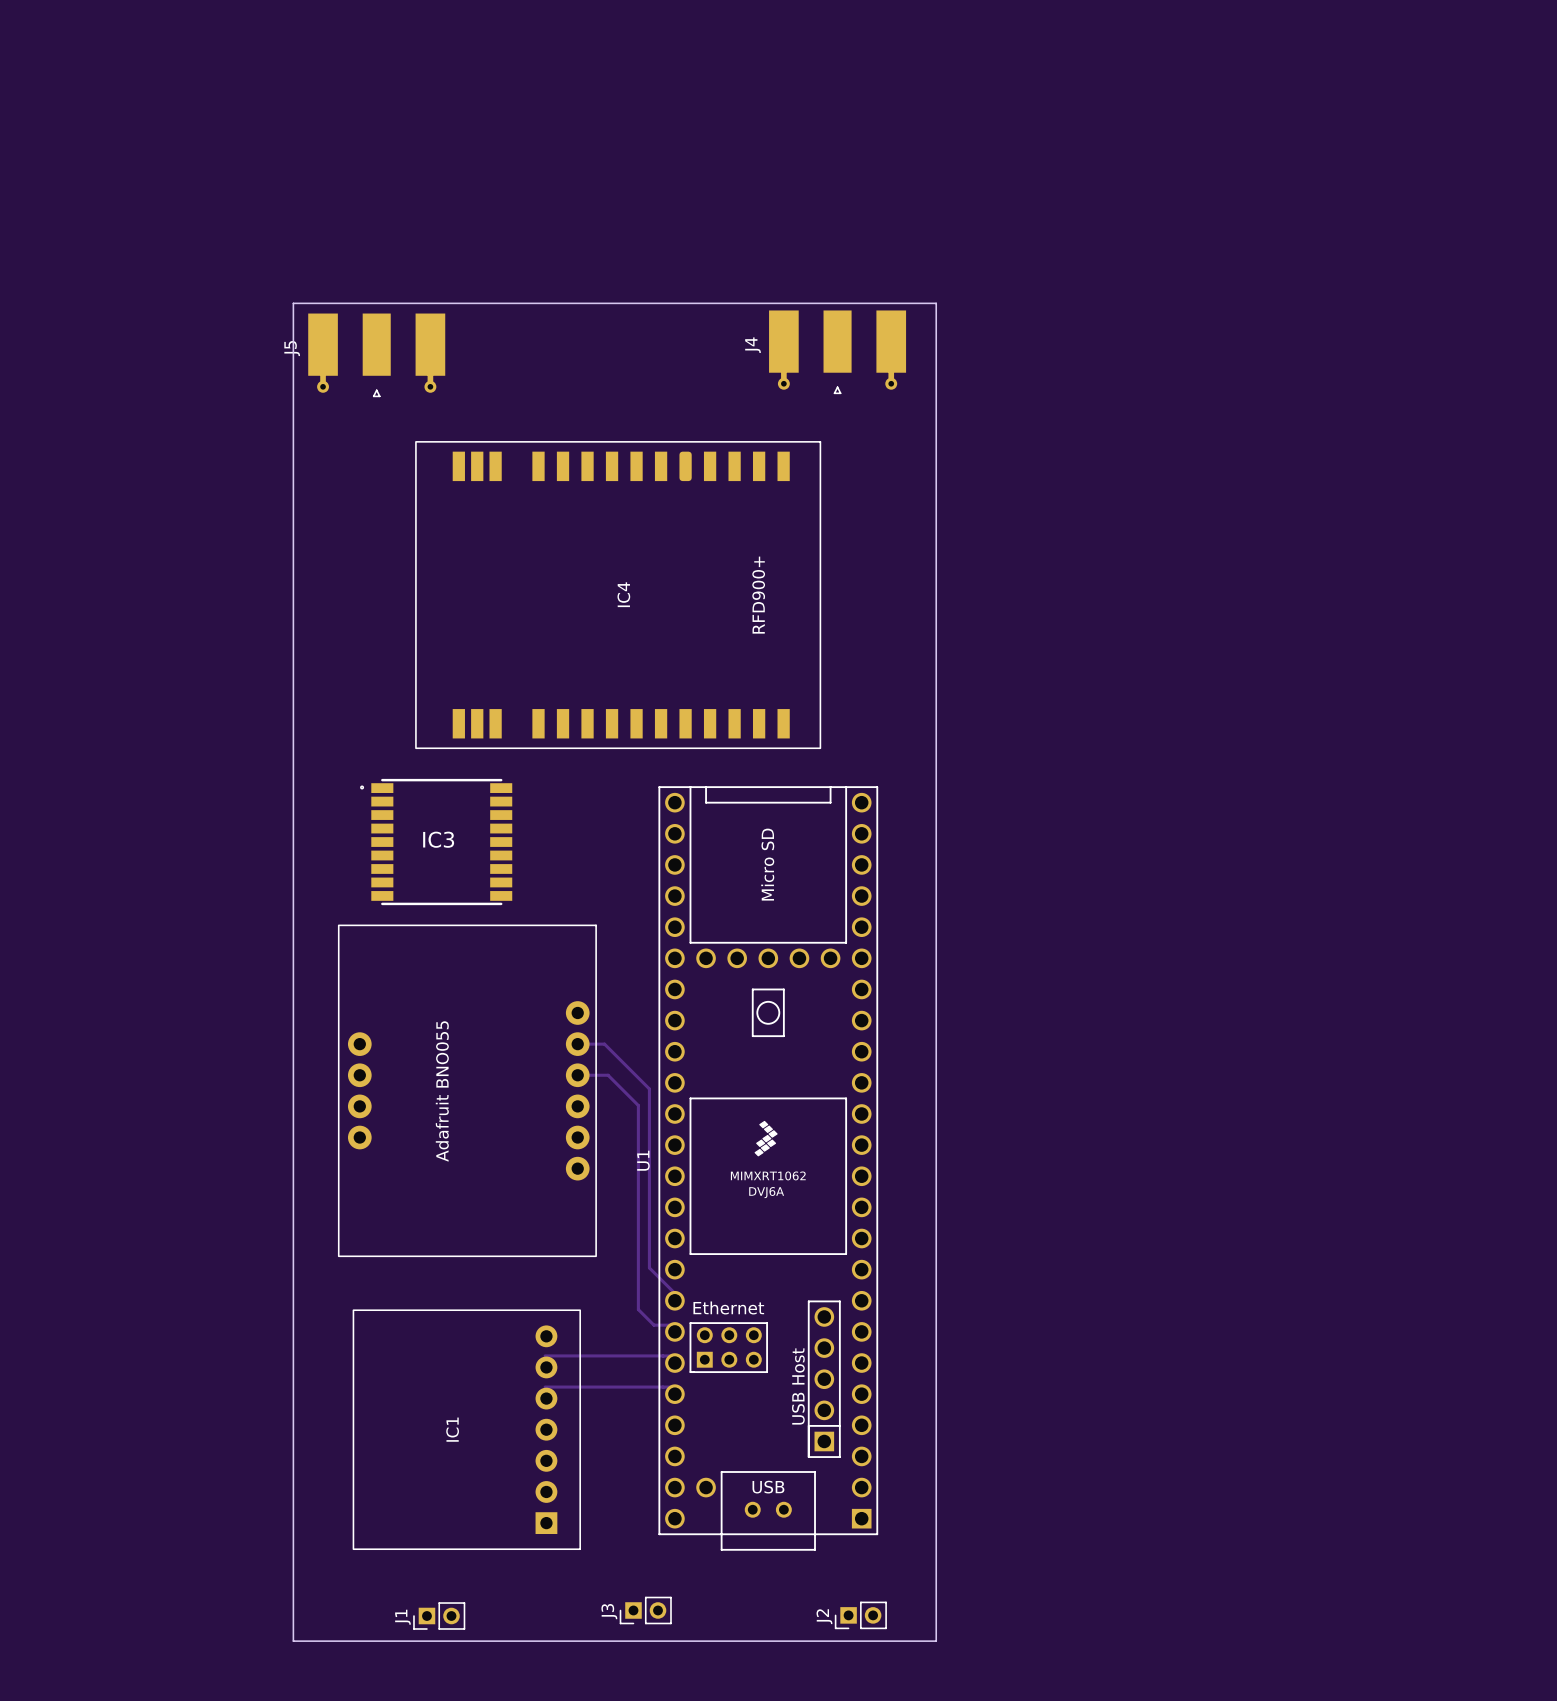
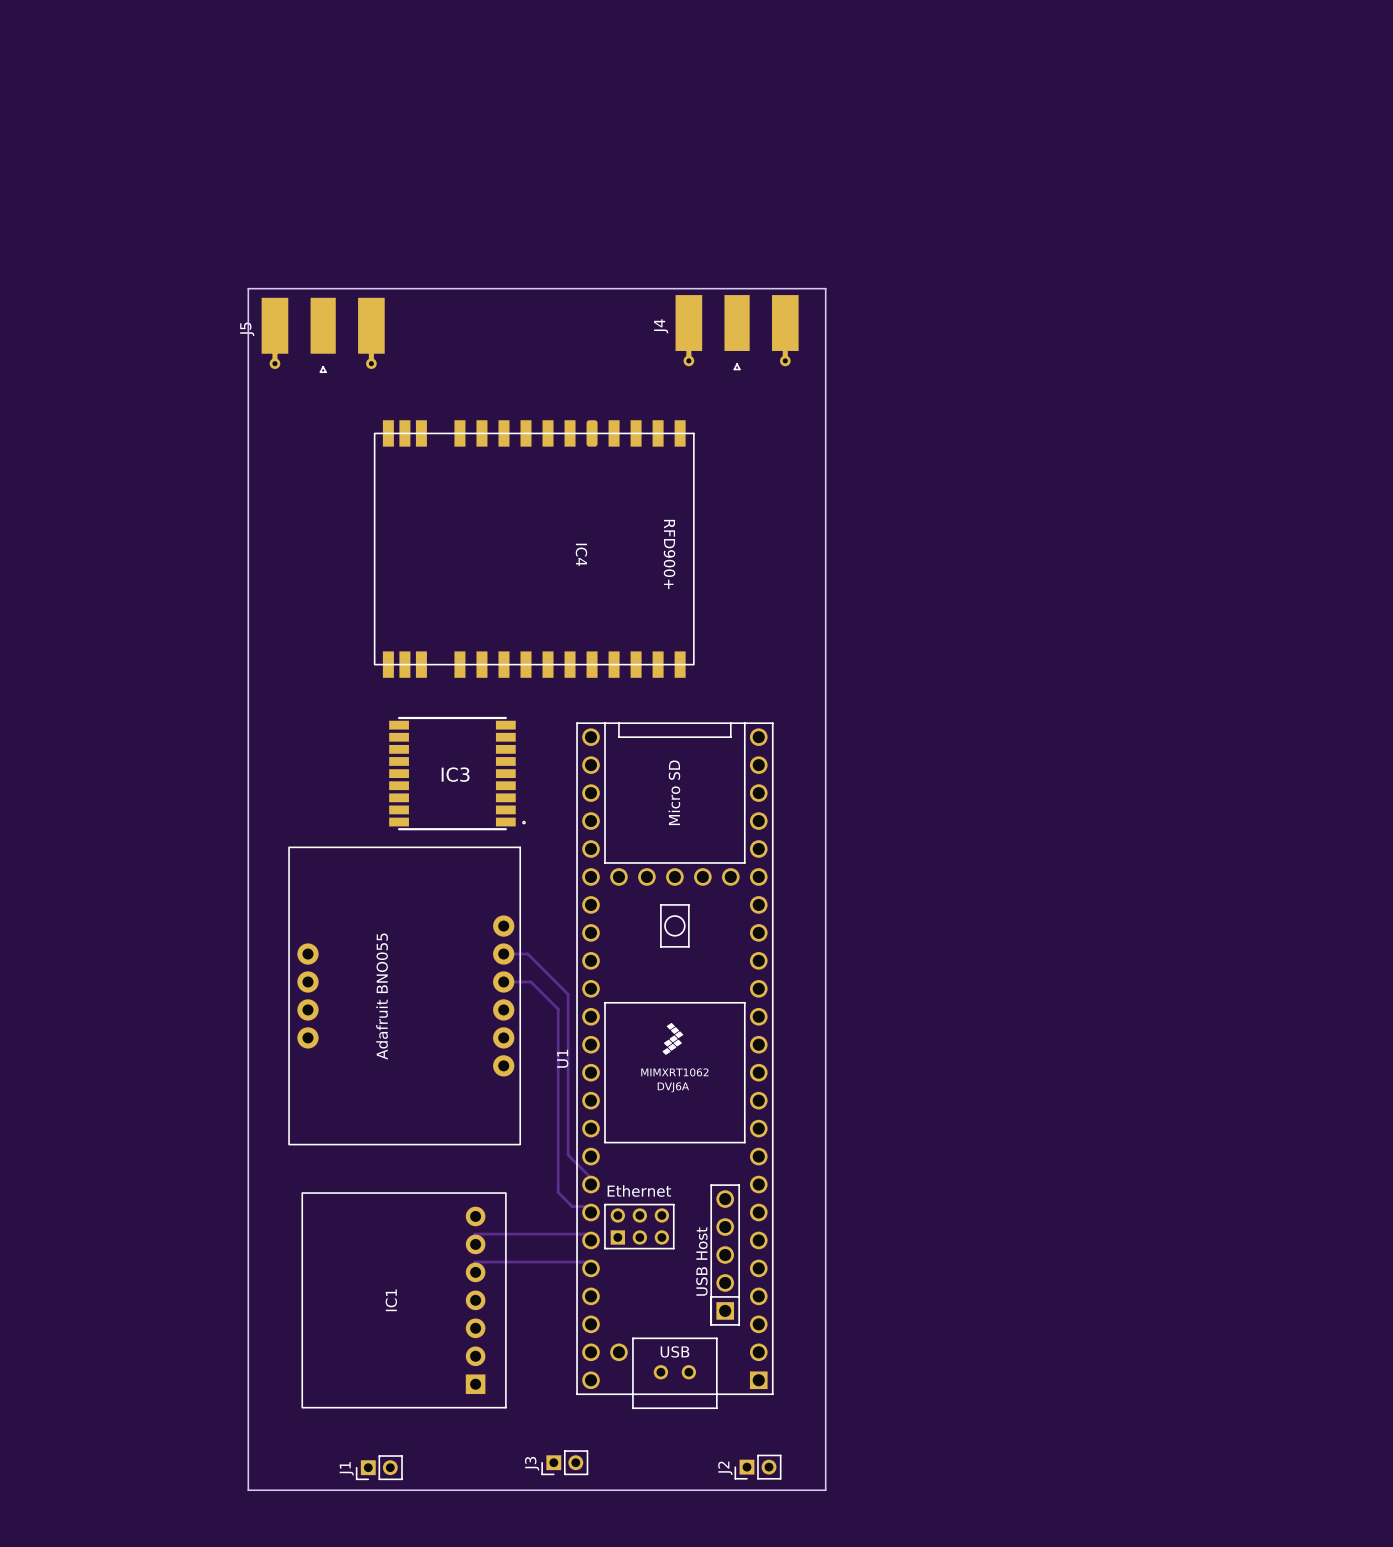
IC4 footprint: [415, 441, 822, 749] -> [373, 420, 695, 678]
IC4 name position: IC4 (623, 594) -> IC4 (581, 554)
IC3 rotation: 0° (436, 842) -> 180° (457, 773)

